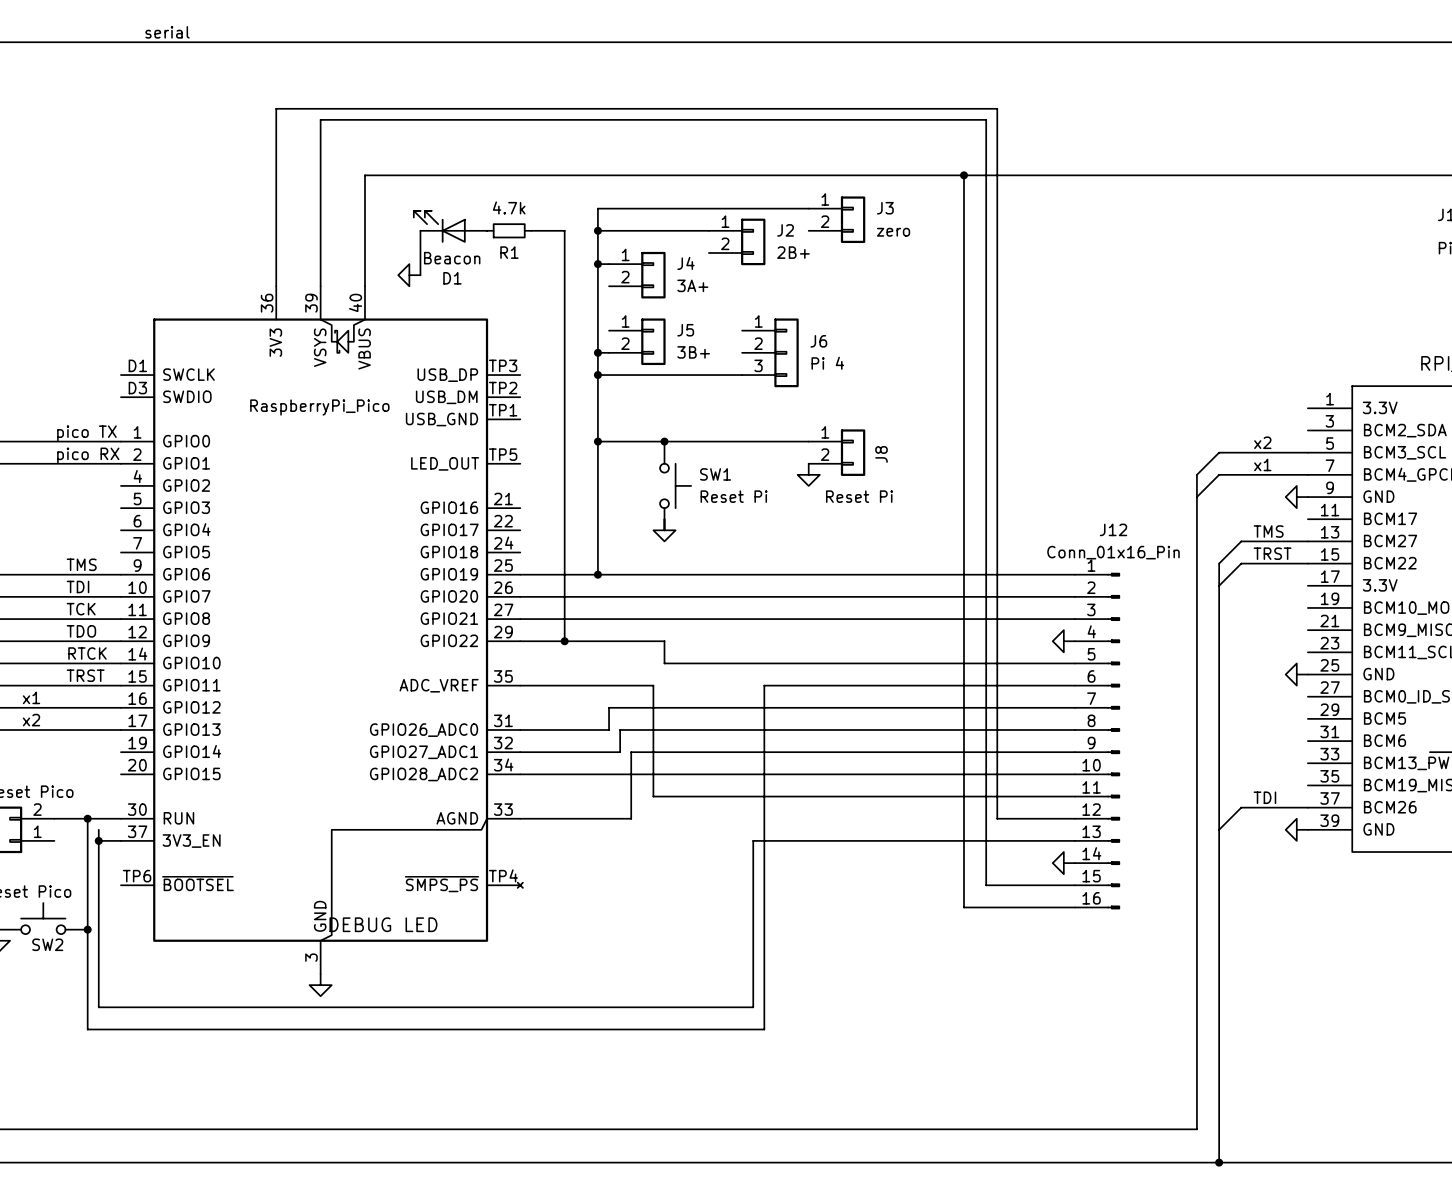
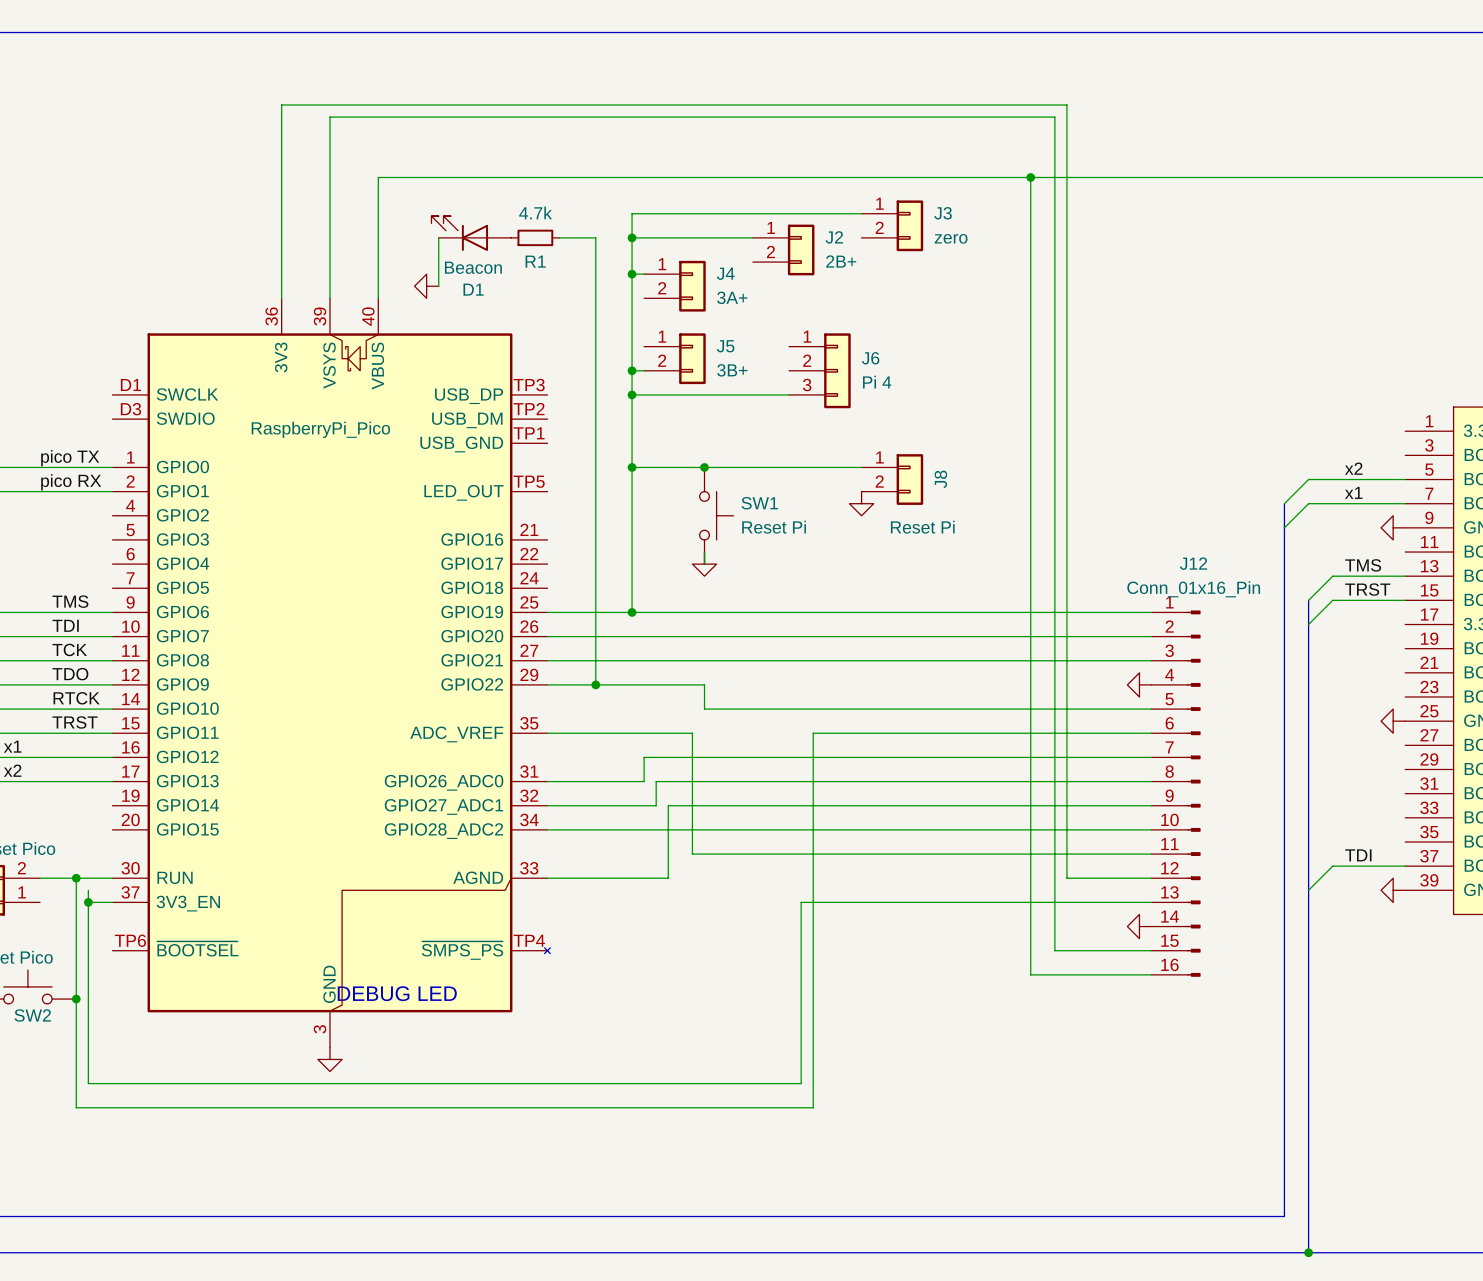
label: serial (167, 32) -> none

